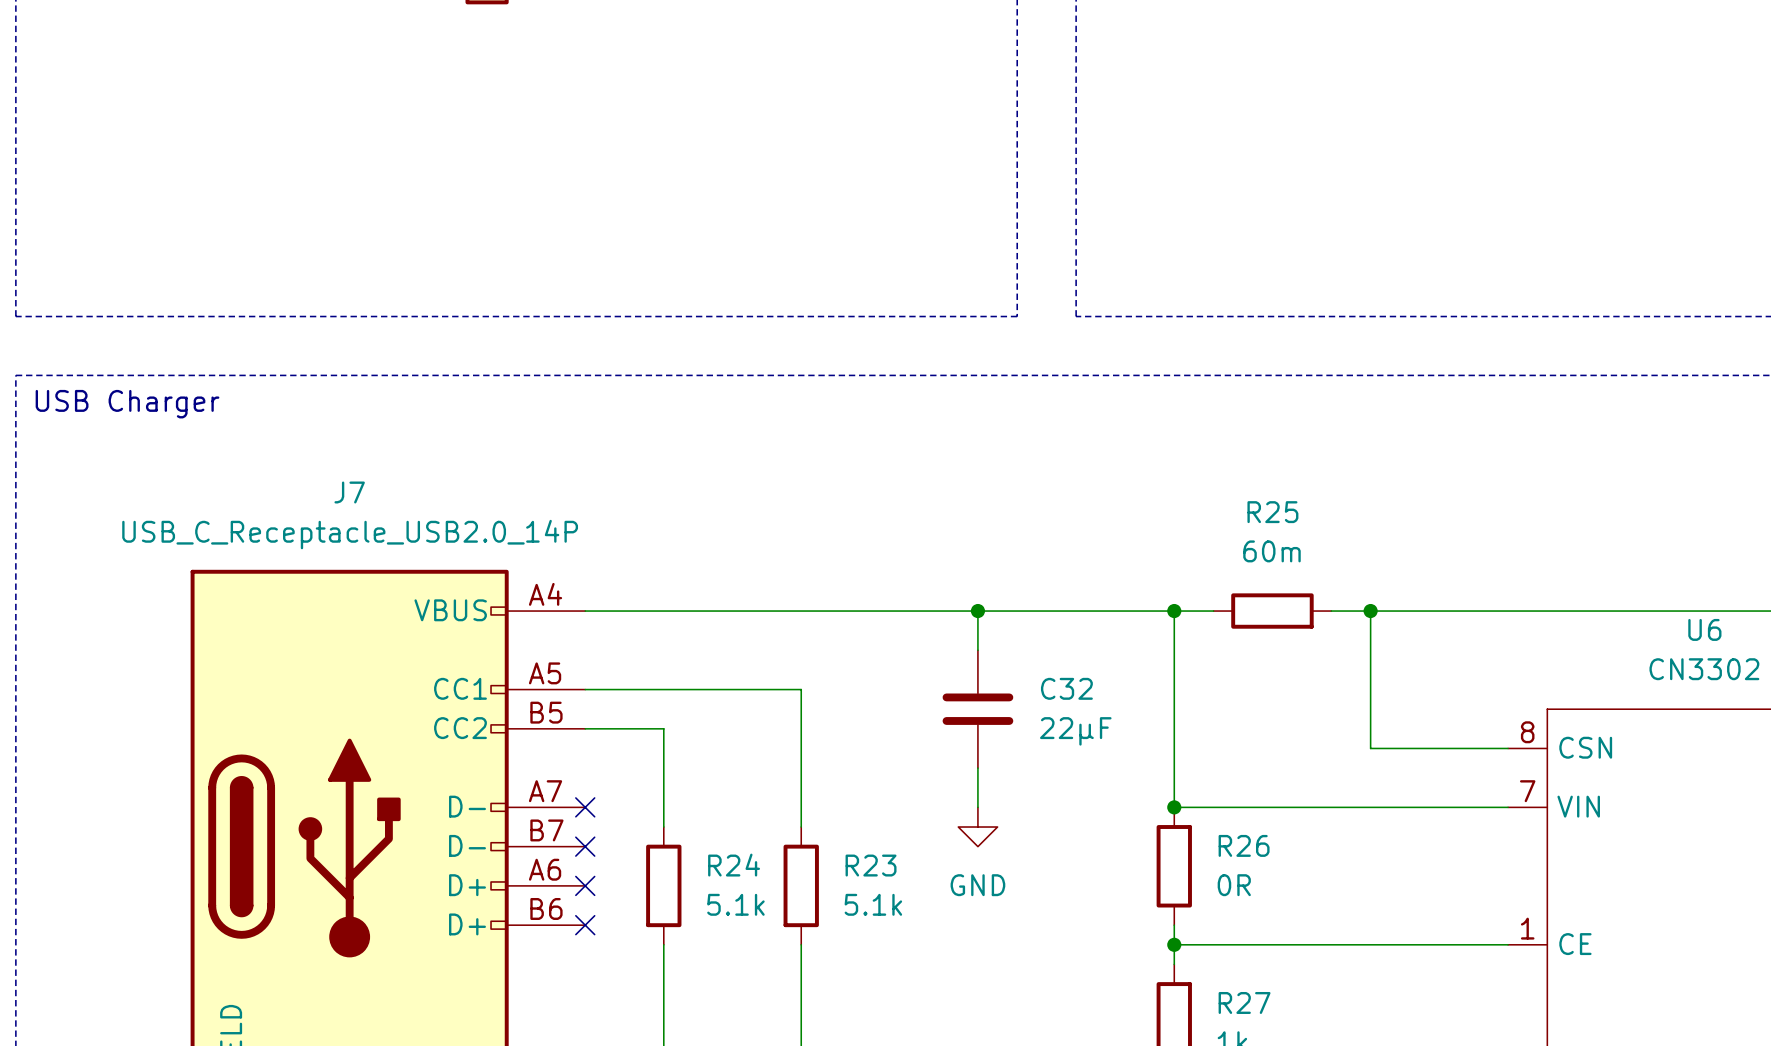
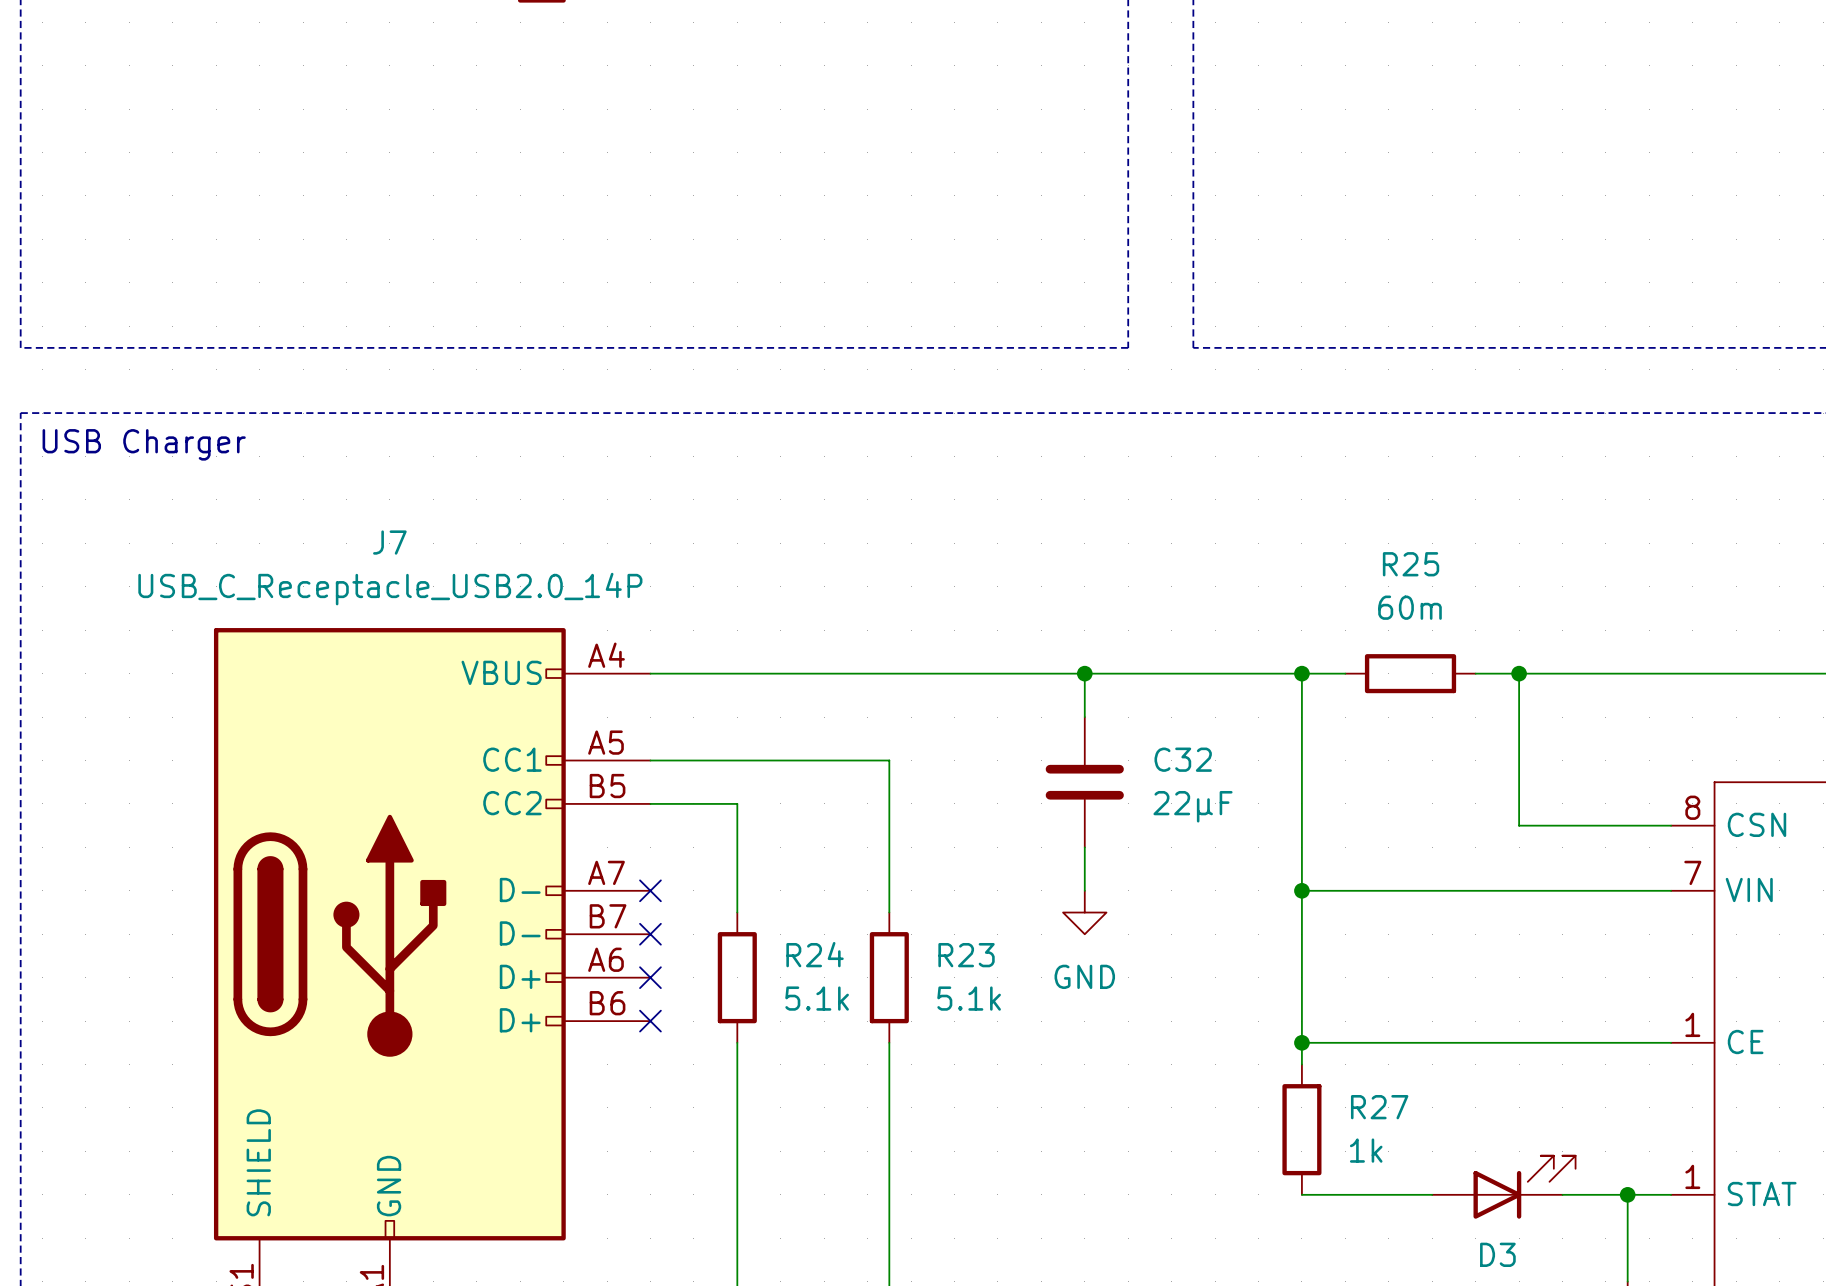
wire: none -> (1301, 890) (1301, 1021)
R26: 0R (1174, 866) -> none

